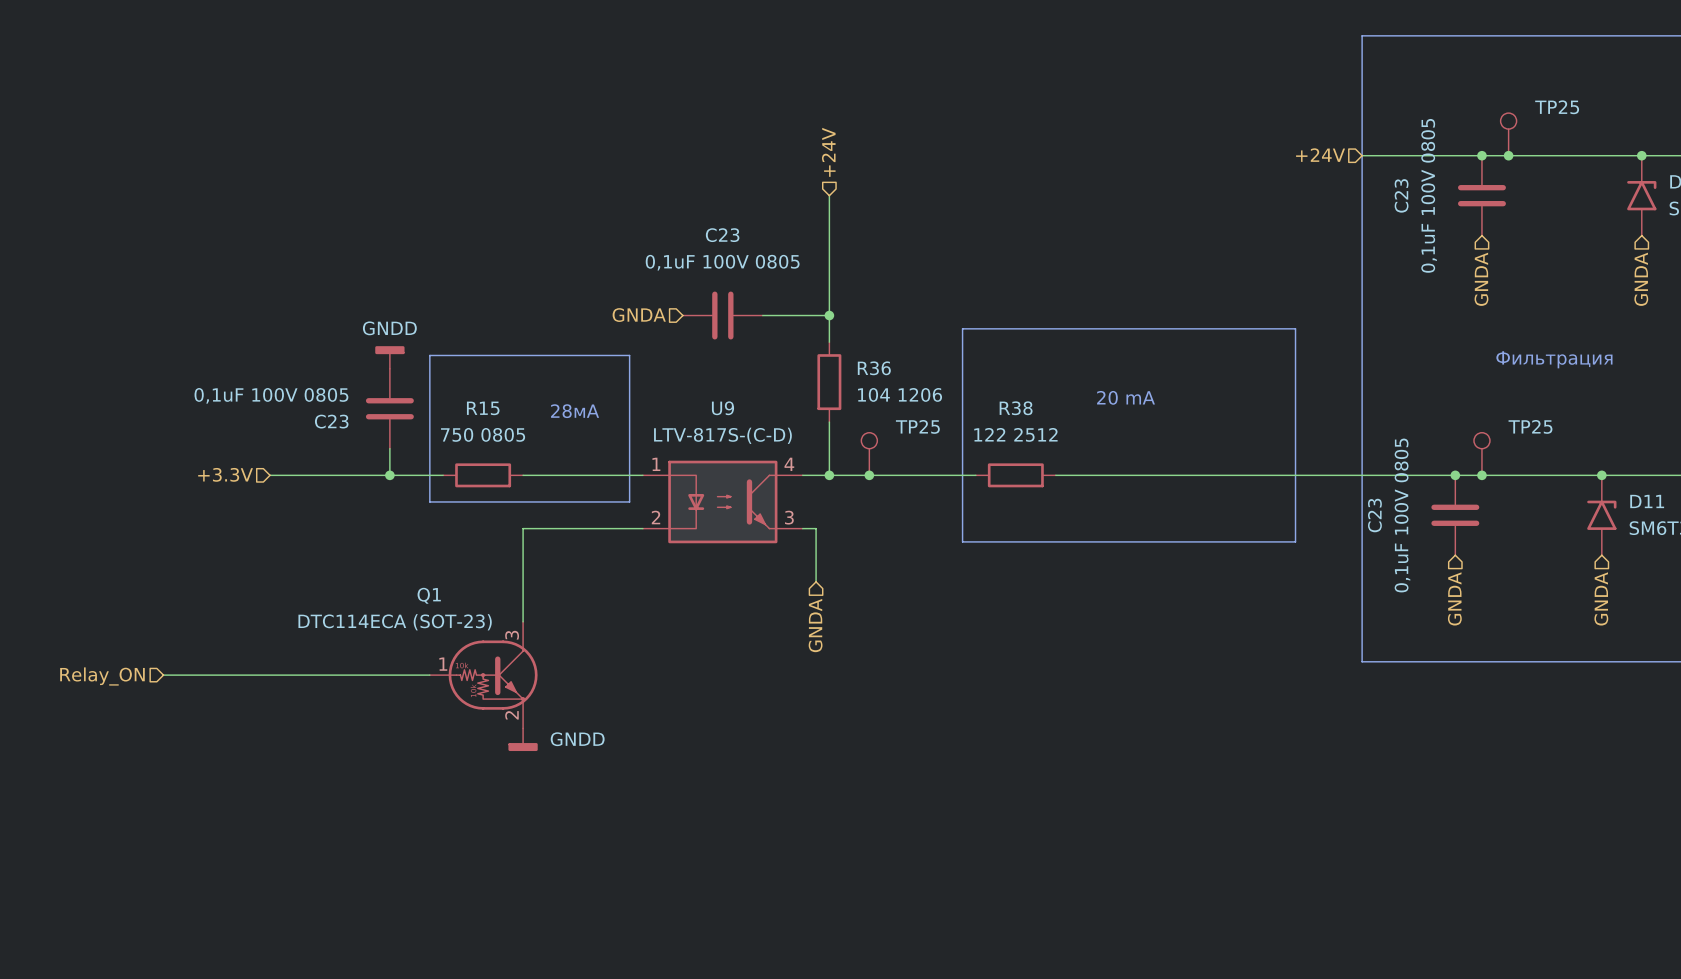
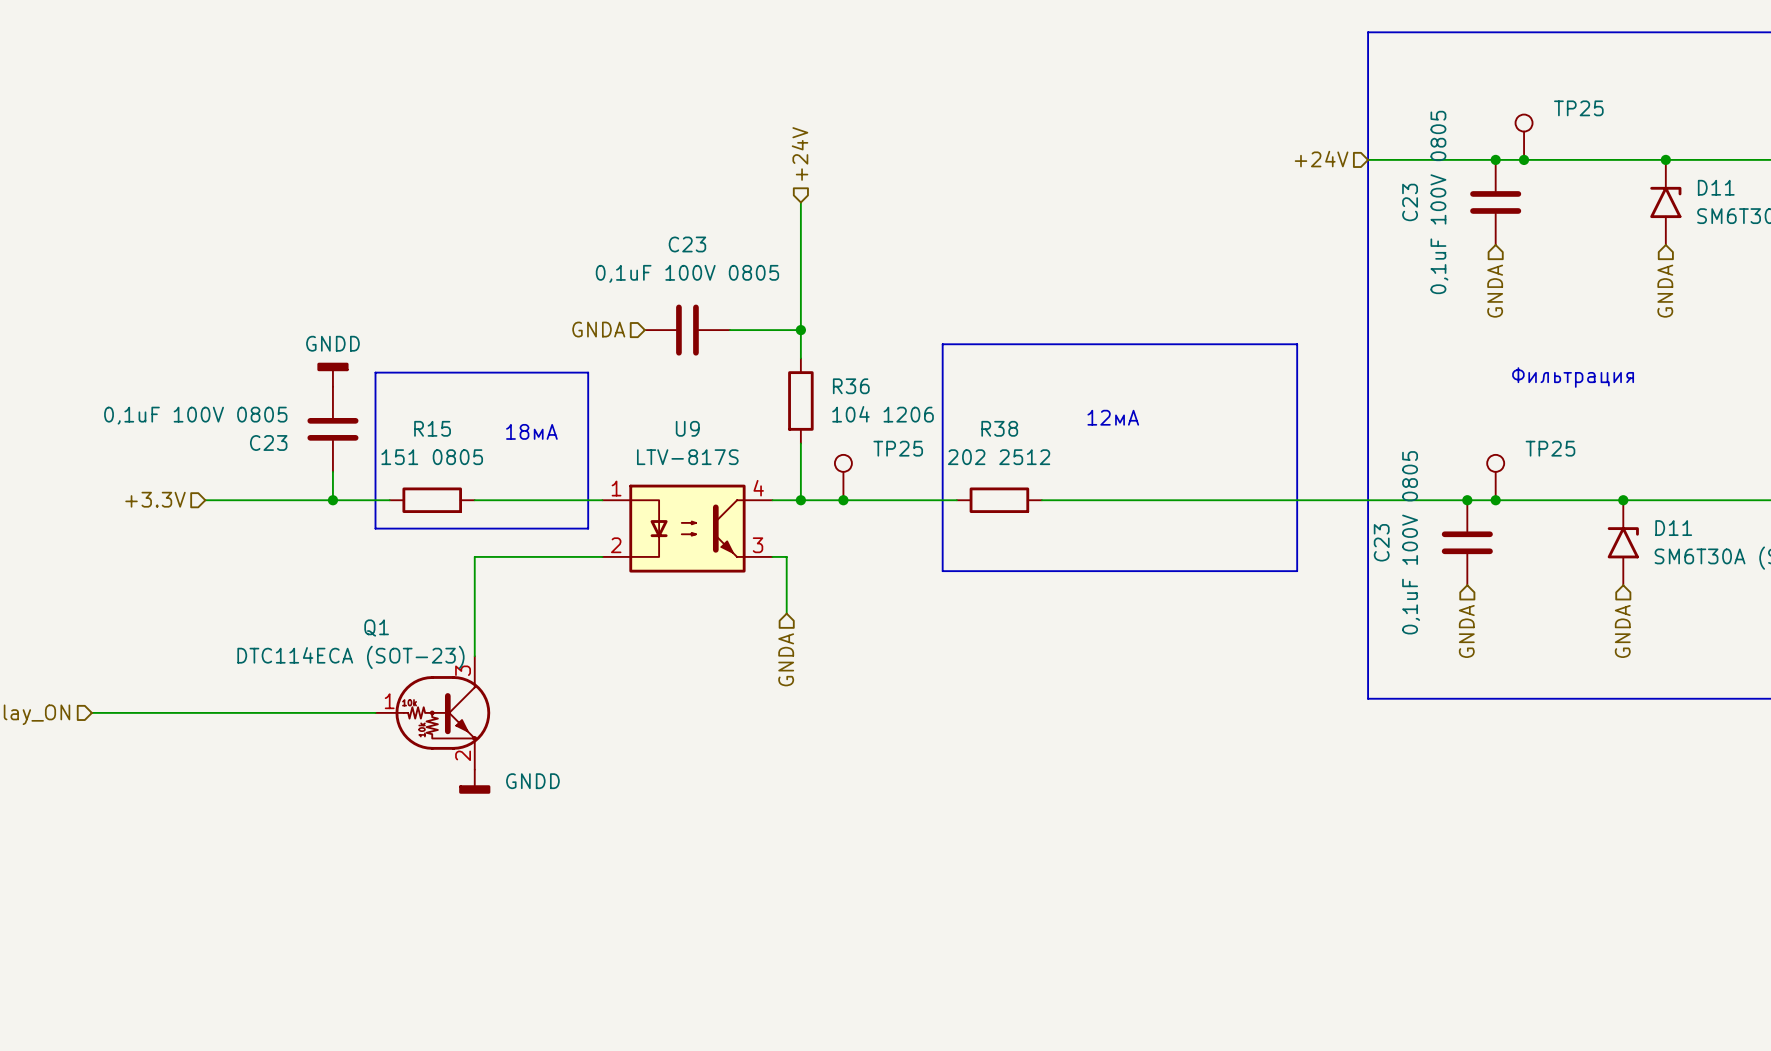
text: 20 mA (1126, 397) -> 12мА (1113, 417)
text: 28мА (575, 411) -> 18мА (531, 431)
R15 value: 750 0805 (483, 434) -> 151 0805 (432, 457)
R38 value: 122 2512 (1015, 434) -> 202 2512 (999, 457)
U9 value: LTV-817S-(С-D) (722, 435) -> LTV-817S (687, 457)

